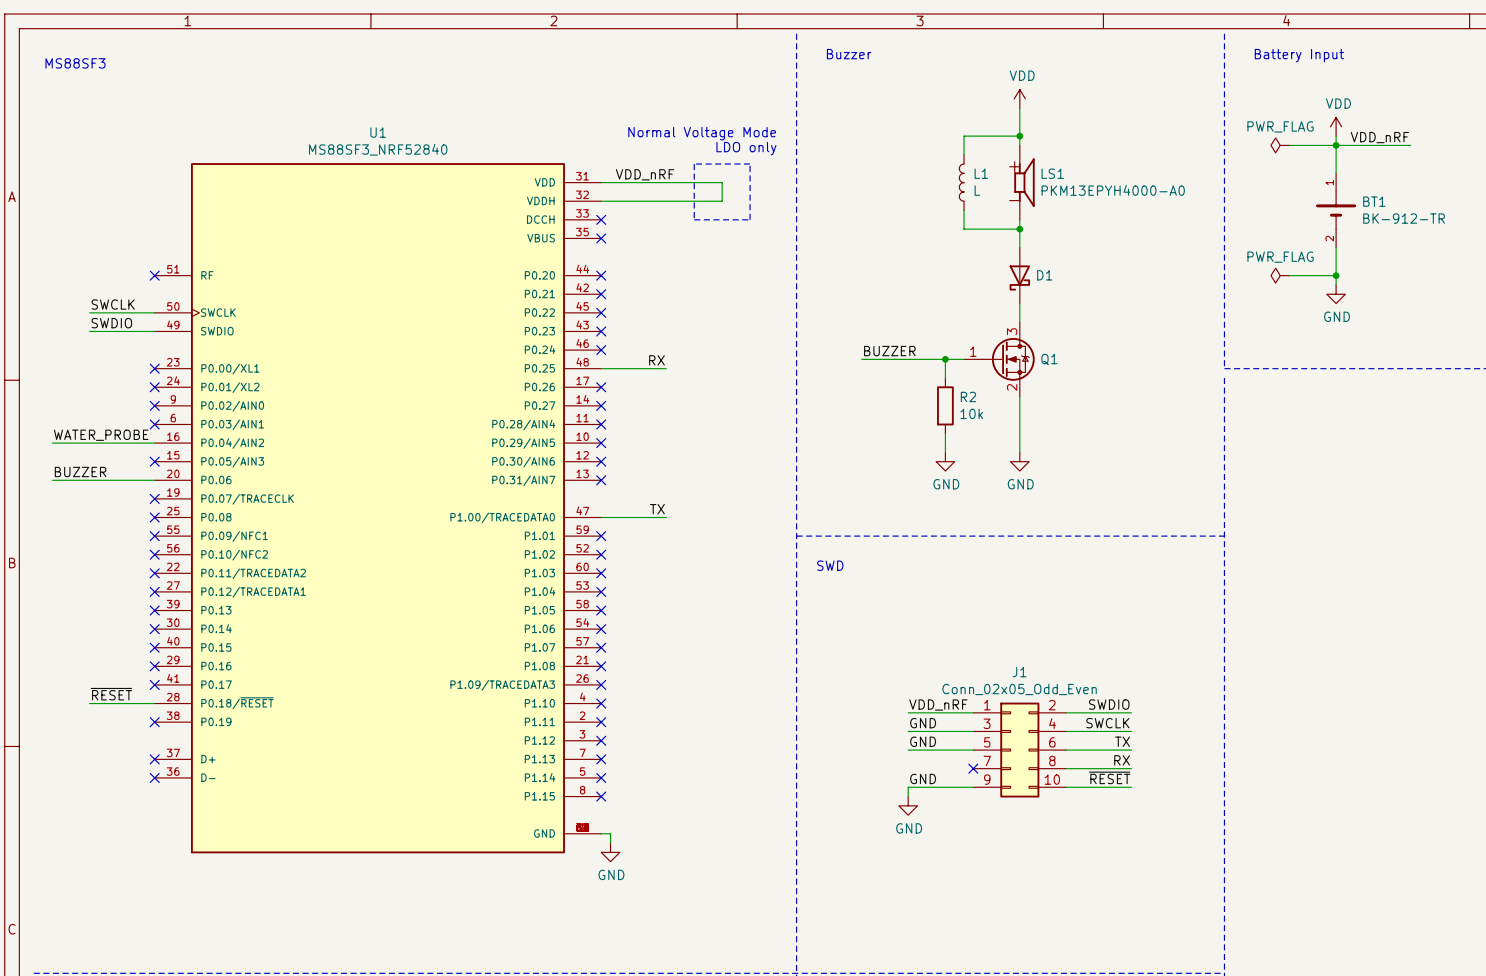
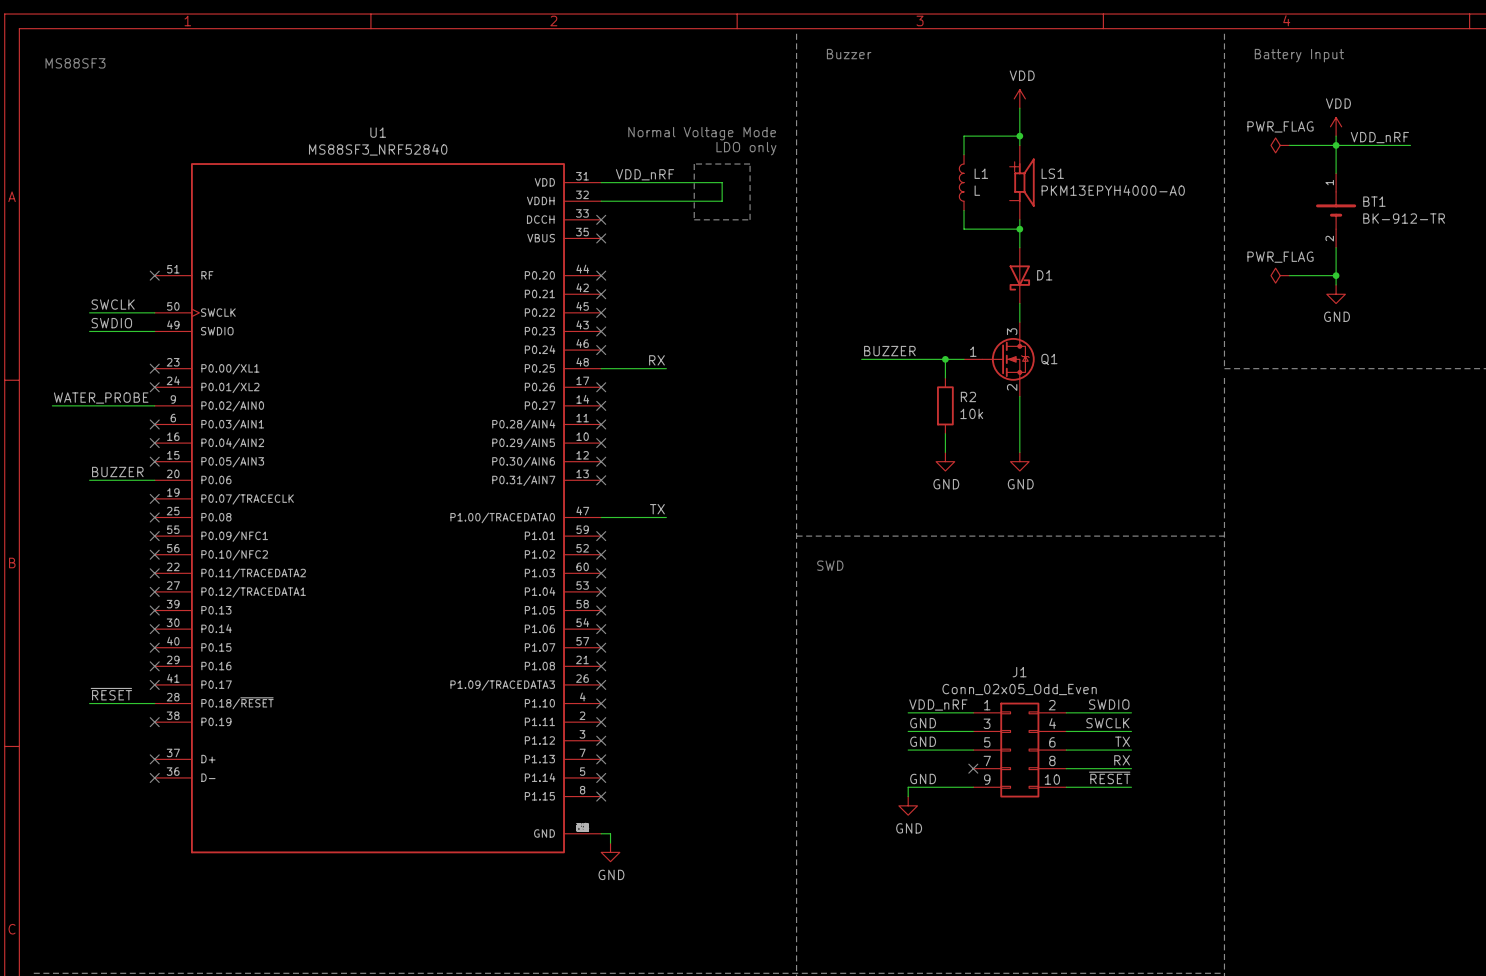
no-connect mark position: (154, 405) -> (154, 443)
label position: WATER_PROBE (101, 435) -> WATER_PROBE (101, 398)
wire: (52, 443) (154, 443) -> (52, 405) (154, 405)
label position: BUZZER (80, 471) -> BUZZER (117, 471)
wire: (52, 480) (89, 480) -> none

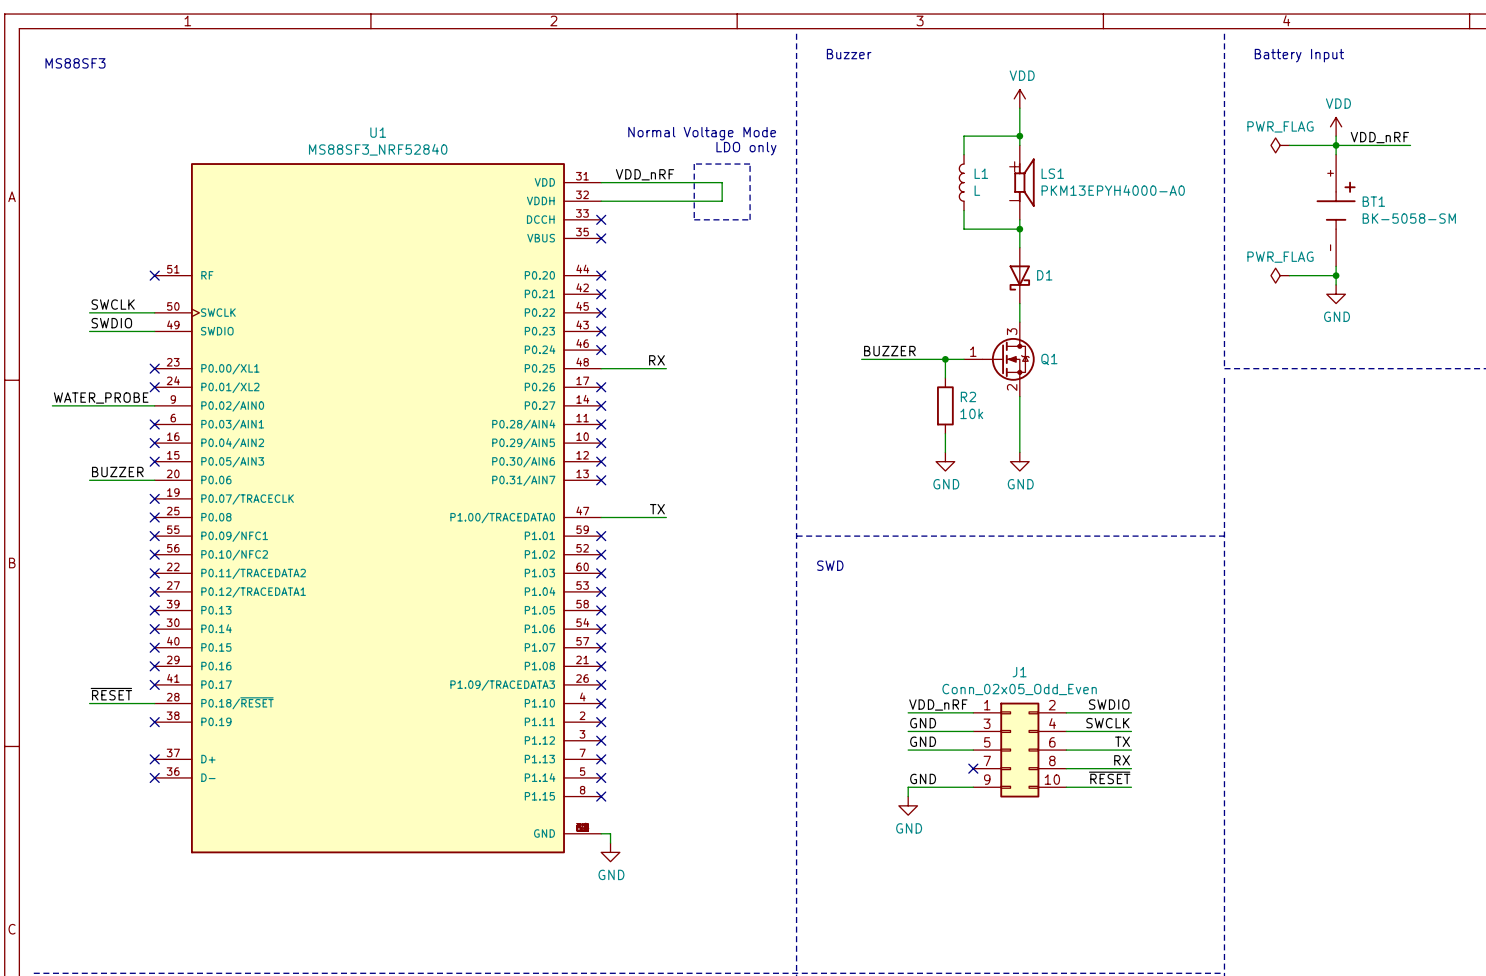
BT1 symbol: [1316, 173, 1357, 248] -> [1316, 154, 1356, 267]
BT1 value: BK-912-TR (1404, 218) -> BK-5058-SM (1409, 218)

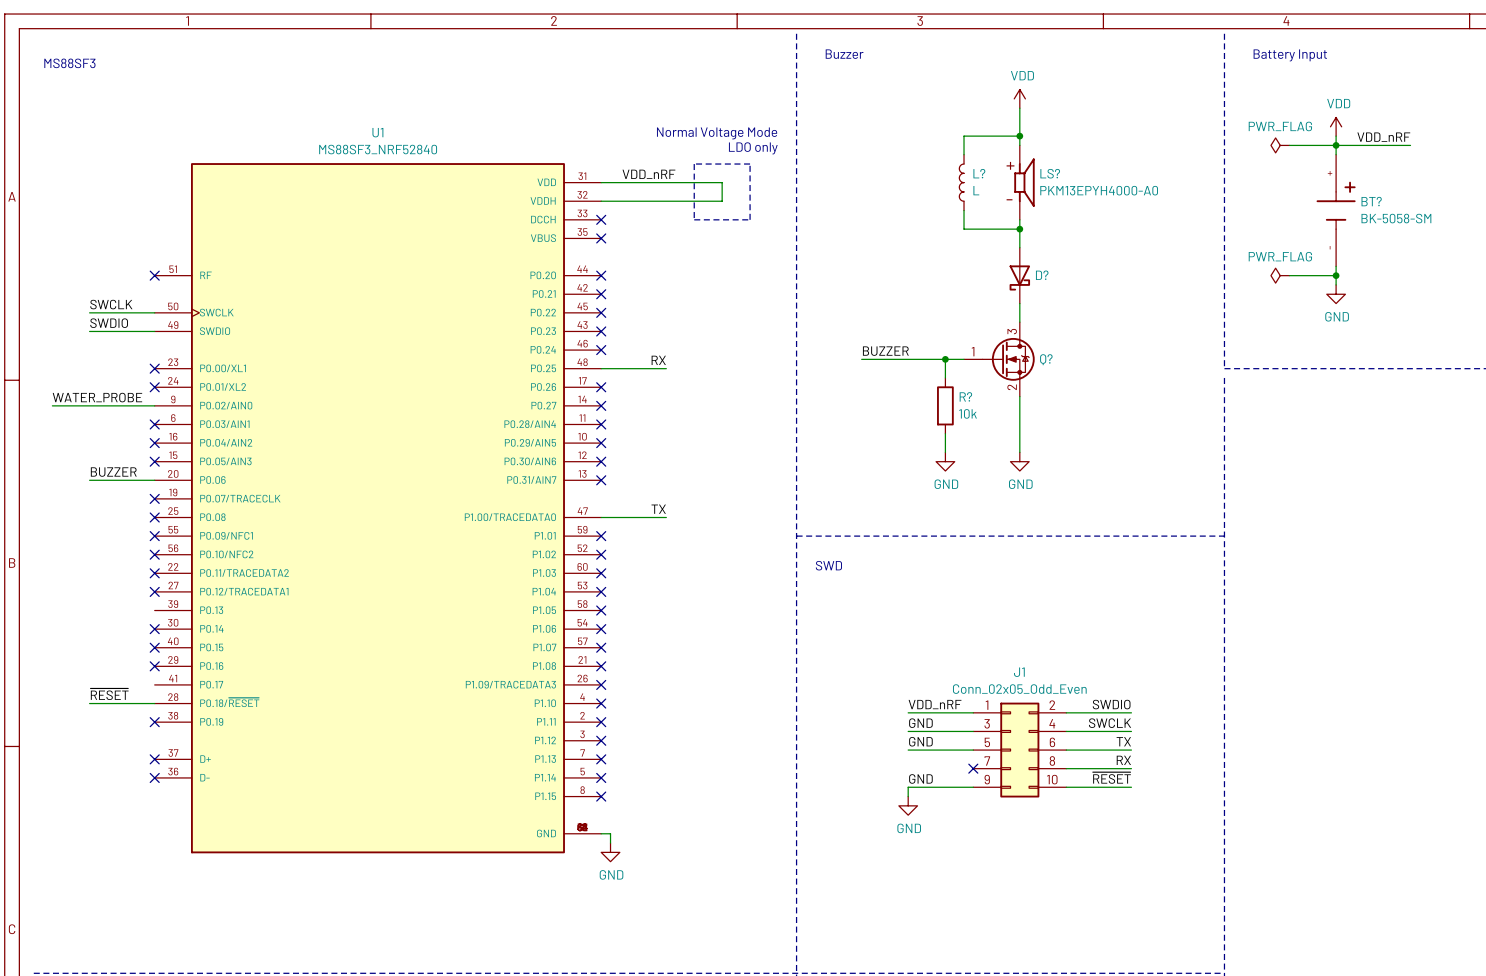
L1 name: L1 (981, 173) -> L? (979, 173)
LS1 name: LS1 (1052, 173) -> LS? (1050, 173)
BT1 name: BT1 (1373, 201) -> BT? (1371, 201)
D1 name: D1 (1044, 275) -> D? (1042, 275)
Q1 name: Q1 (1049, 359) -> Q? (1046, 359)
R2 name: R2 (968, 396) -> R? (965, 396)
no-connect mark: (154, 610) -> none
no-connect mark: (154, 684) -> none

